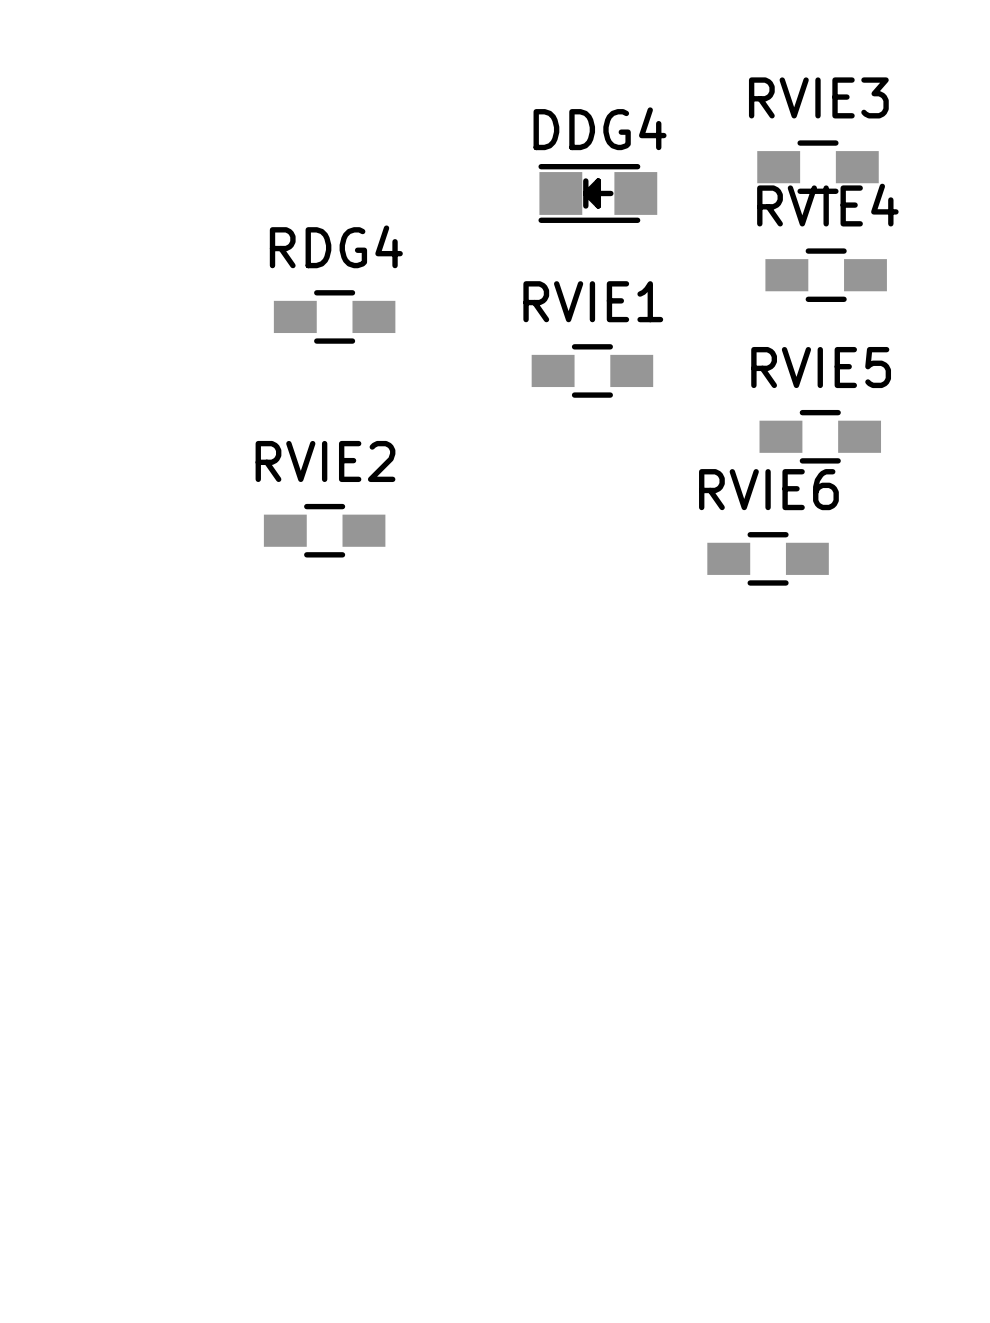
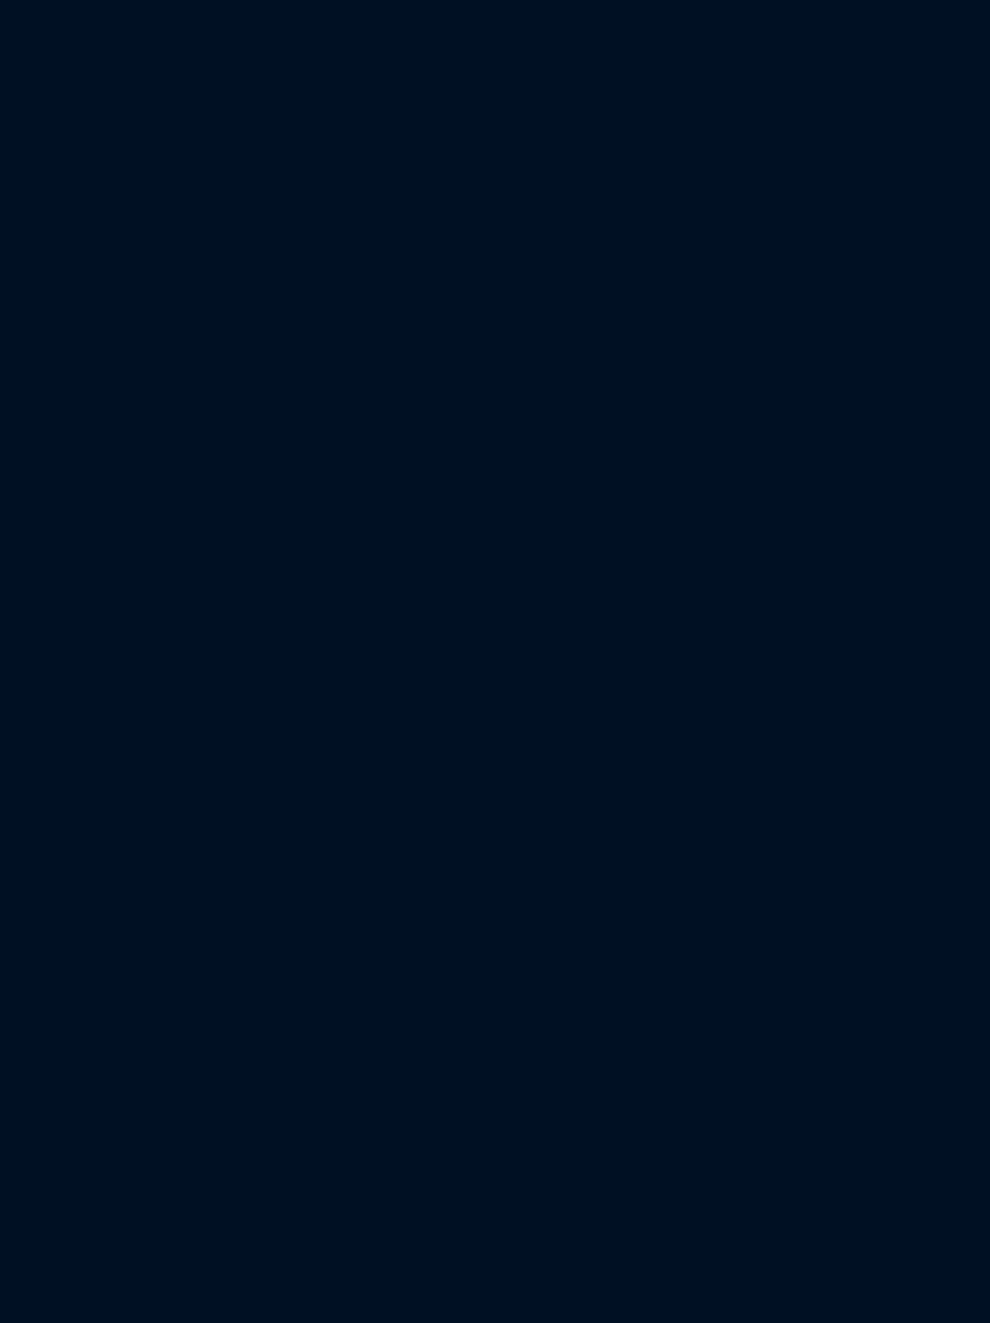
RVIE3: (818, 167) -> none
DDG4: (597, 193) -> none
RVIE4: (826, 275) -> none
RDG4: (334, 316) -> none
RVIE1: (592, 370) -> none
RVIE5: (820, 436) -> none
RVIE2: (324, 530) -> none
RVIE6: (768, 558) -> none

